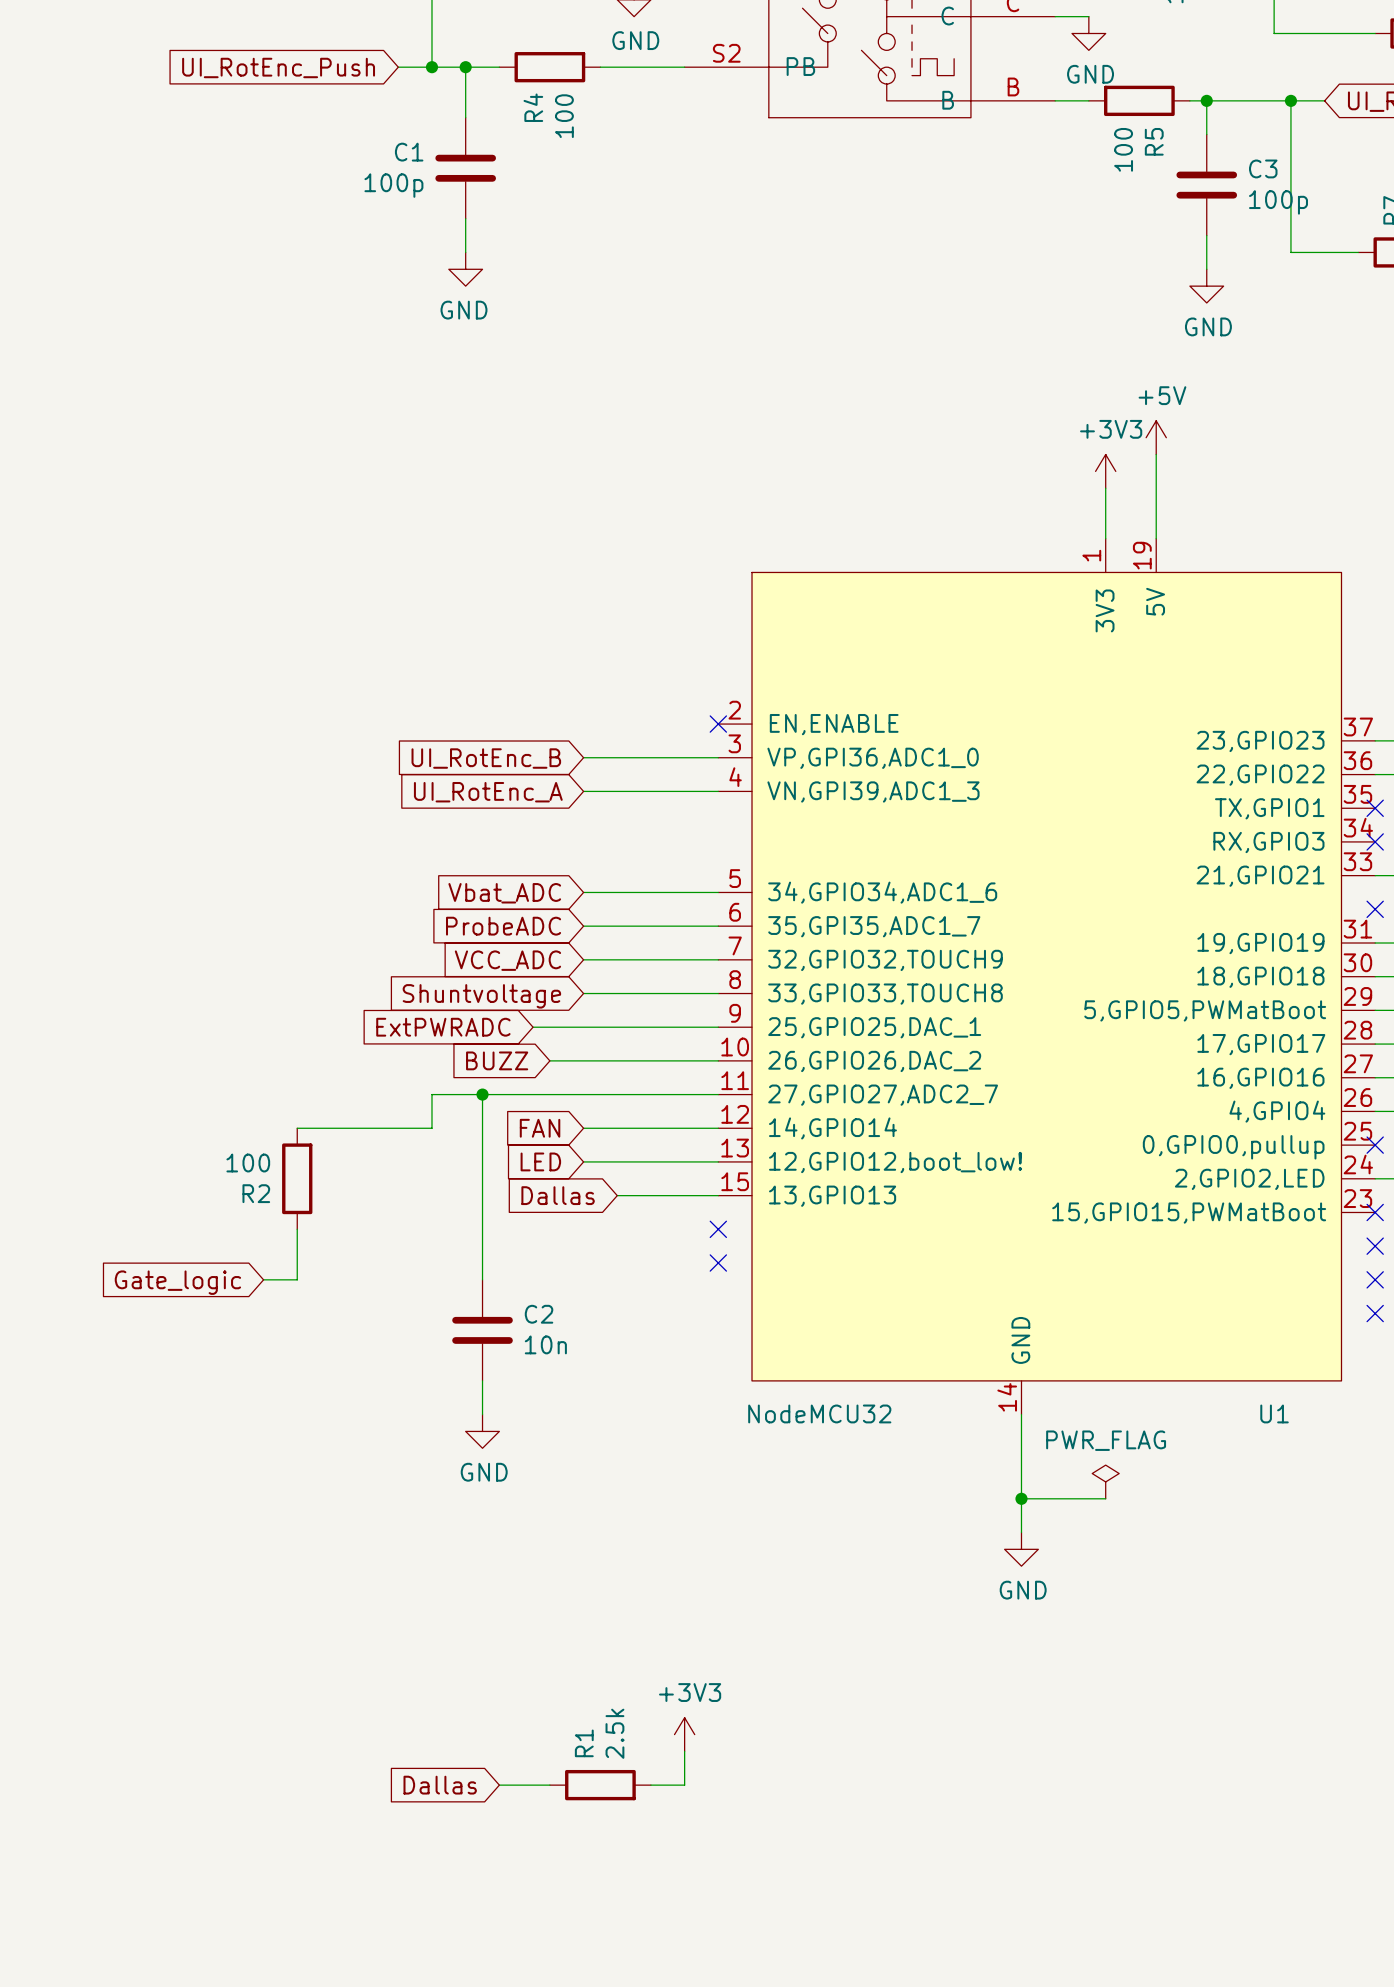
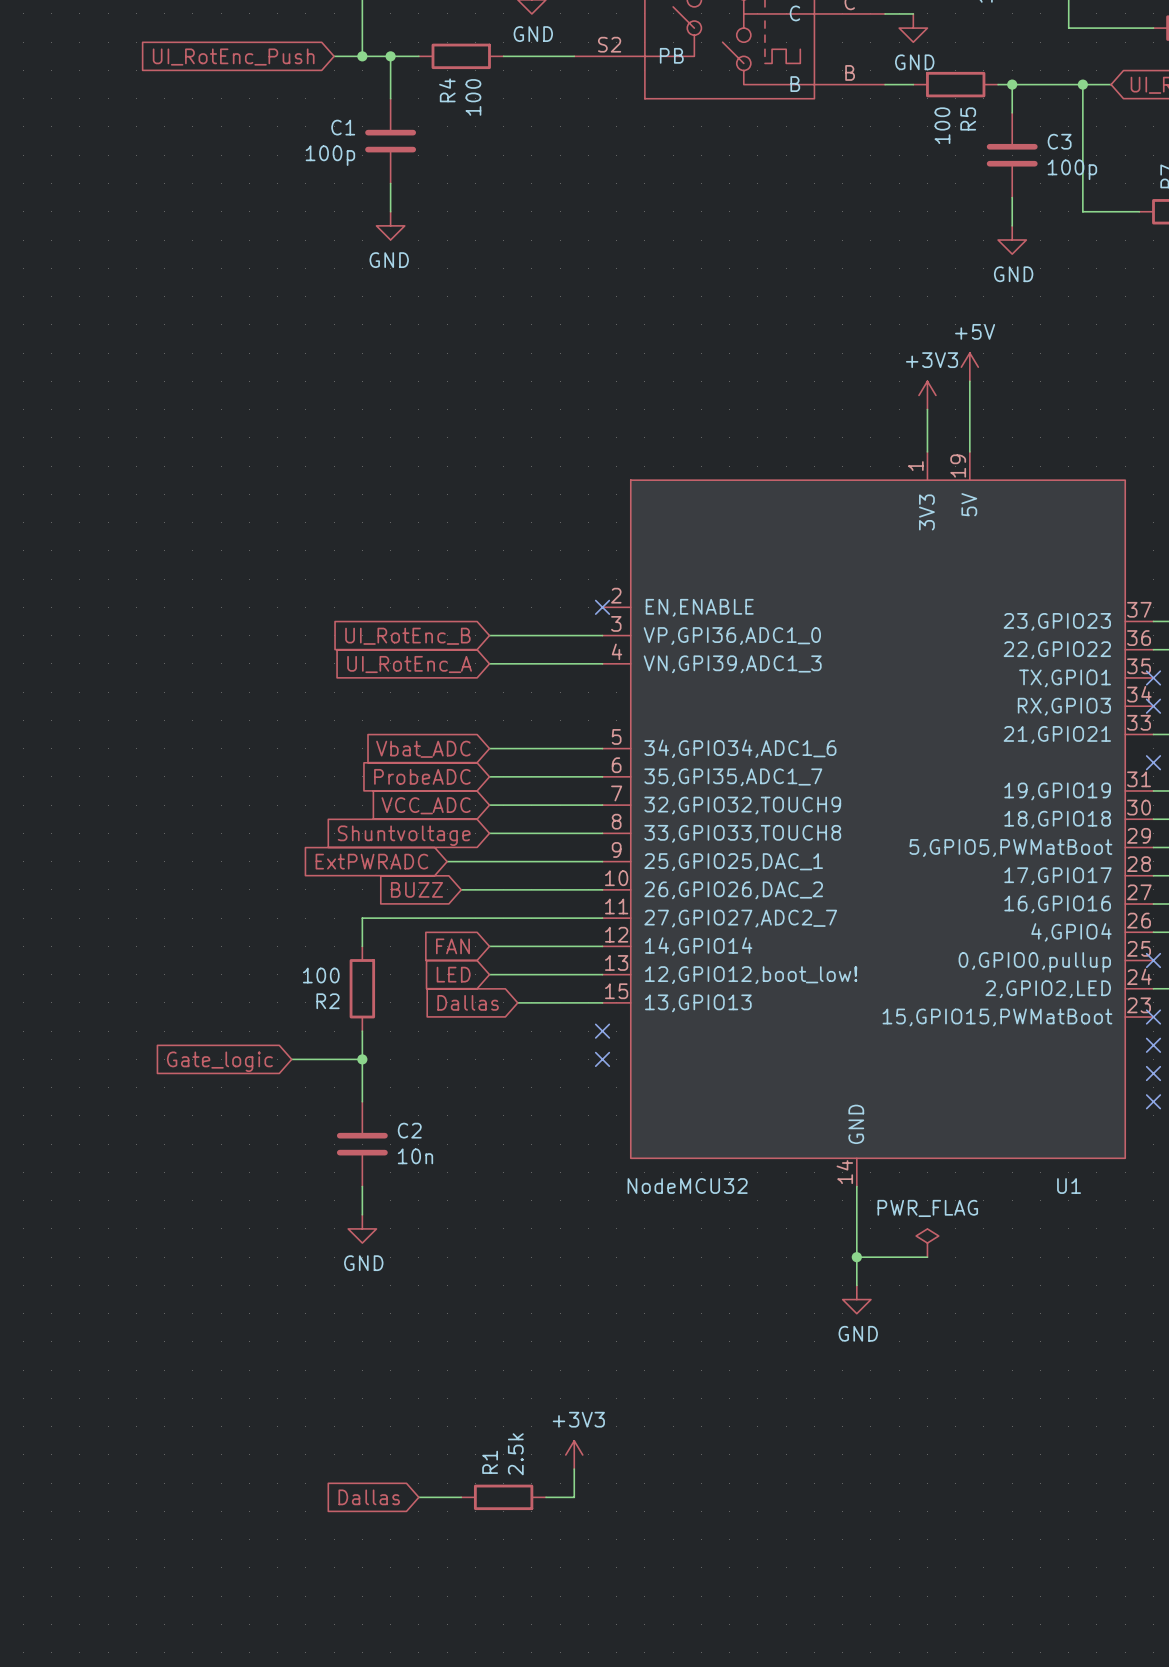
wire: (482, 1094) (482, 1279) -> none
junction: (482, 1094) -> none
wire: (297, 1128) (431, 1128) -> none
R2 position: (297, 1178) -> (362, 988)
wire: (297, 1229) (297, 1279) (263, 1279) -> none
wire: none -> (362, 1031) (362, 1101)
wire: none -> (291, 1059) (362, 1059)
junction: none -> (362, 1059)
global label position: Gate_logic (177, 1282) -> Gate_logic (219, 1061)
C2 position: (482, 1330) -> (362, 1144)
wire: (482, 1380) (482, 1414) -> (362, 1186) (362, 1214)
power symbol position: GND (482, 1431) -> GND (362, 1228)

